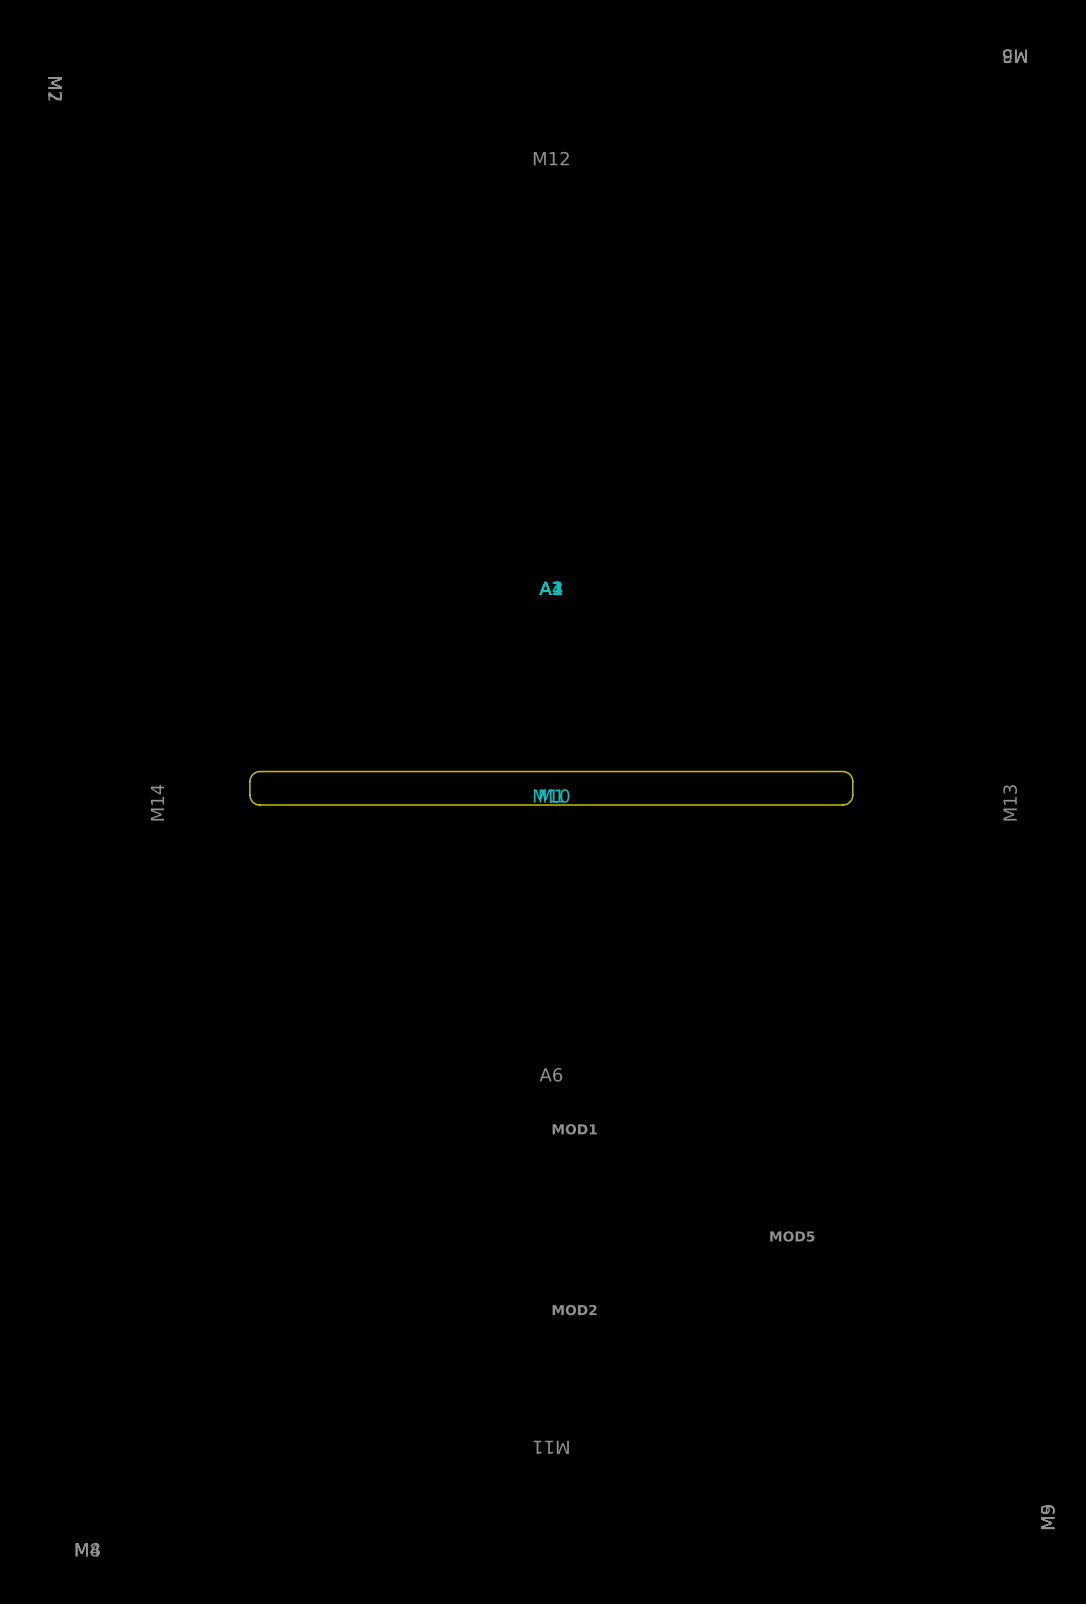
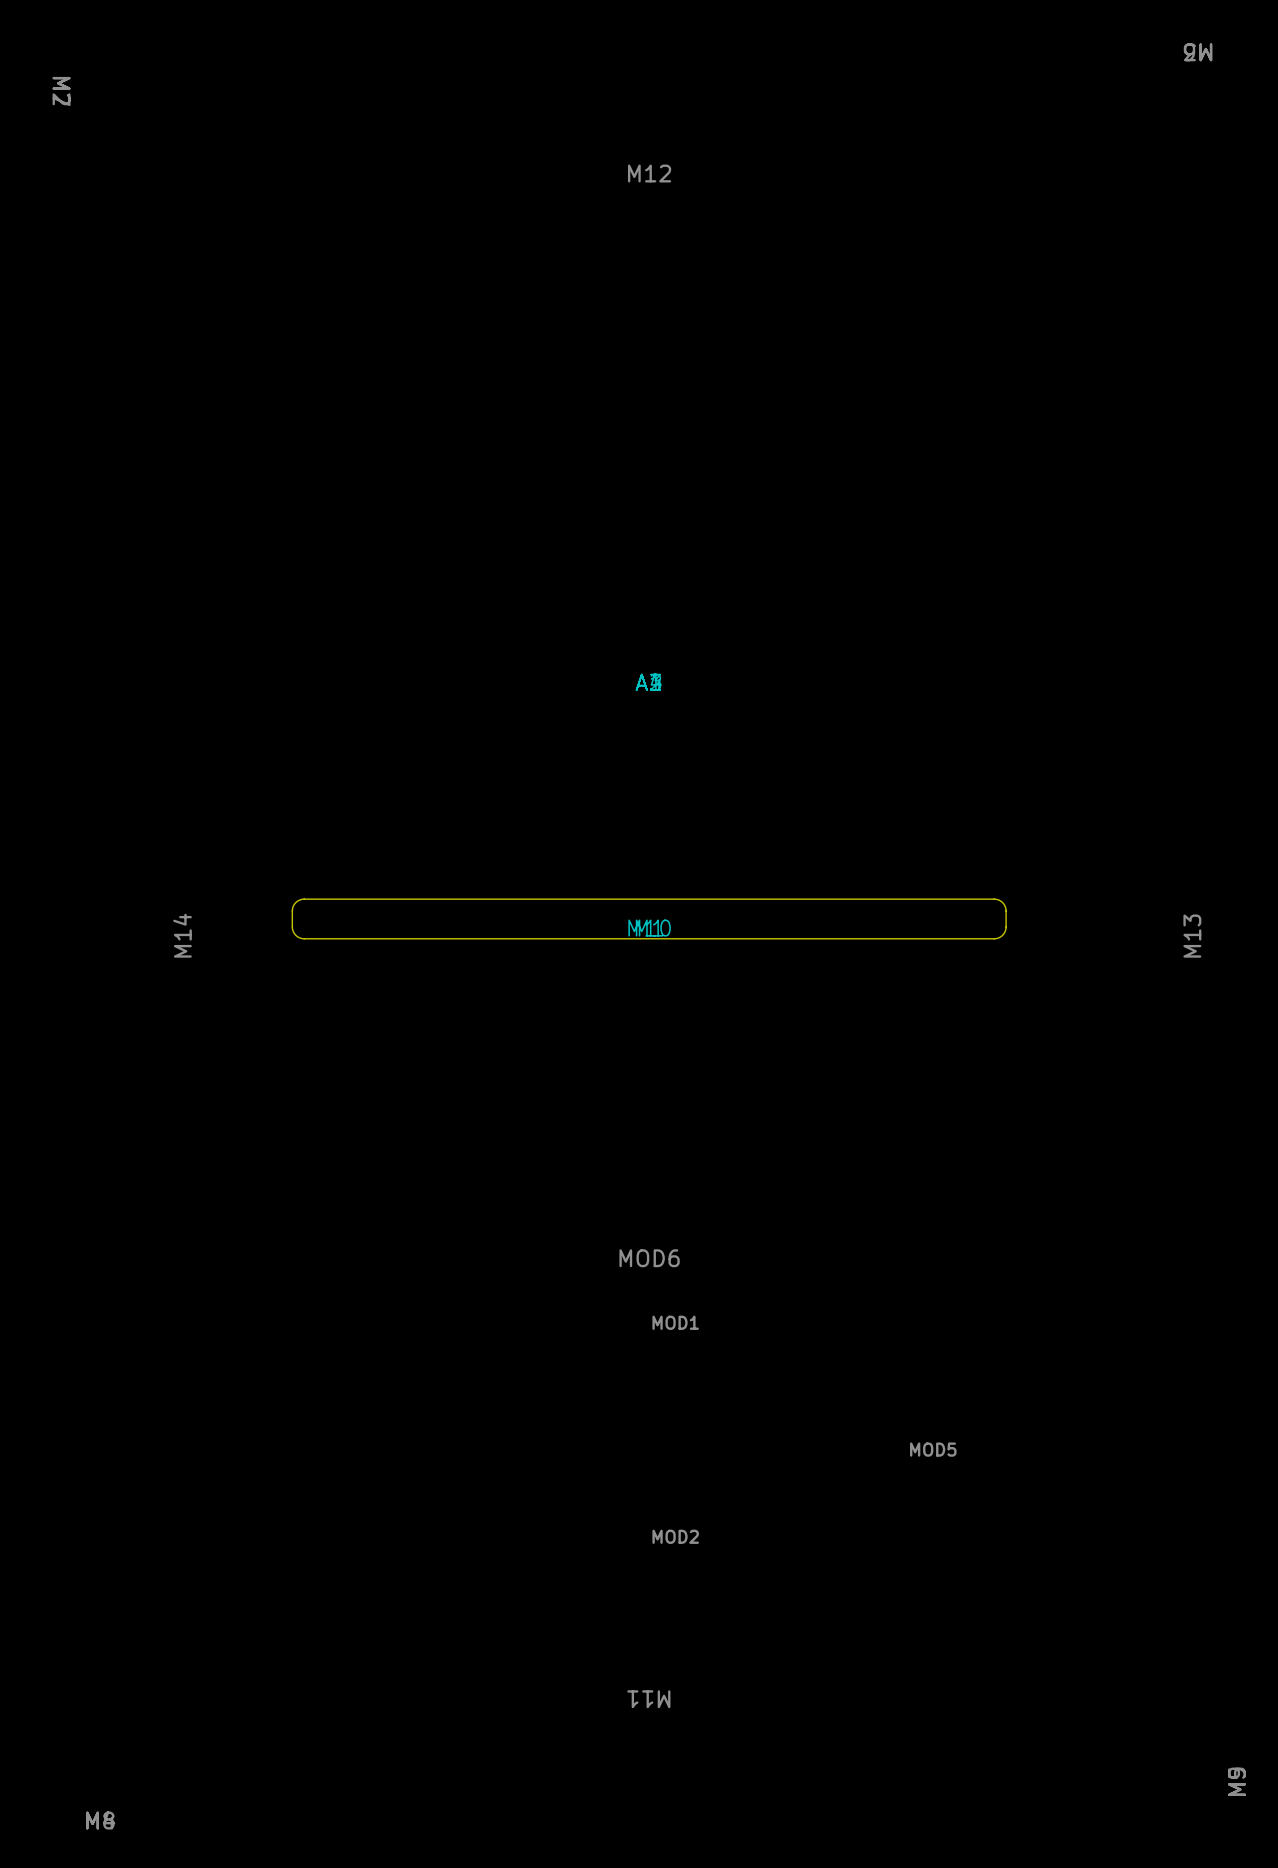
A6 name: A6 (550, 1074) -> MOD6 (649, 1258)

